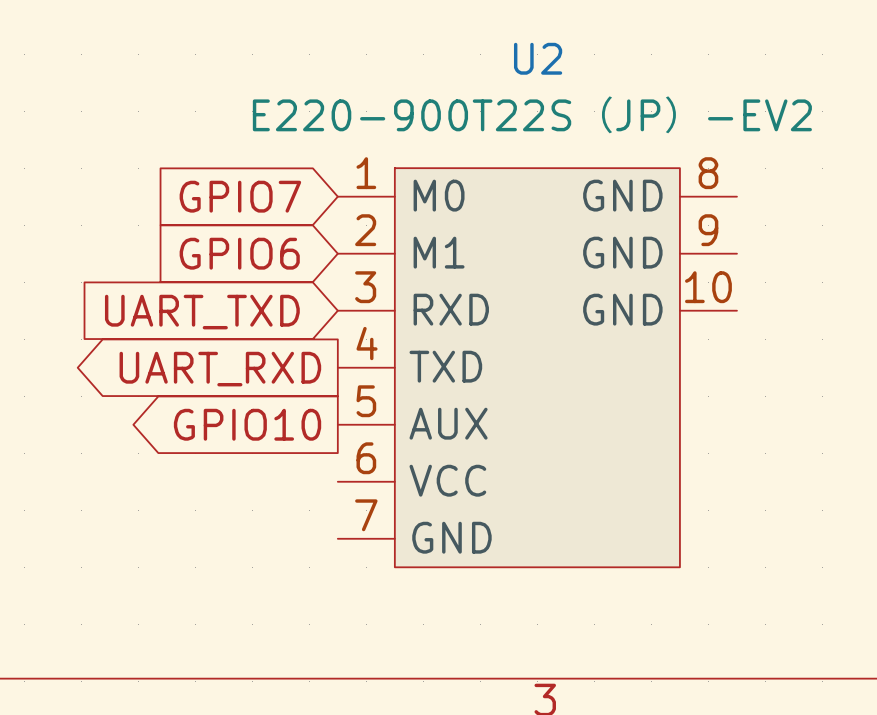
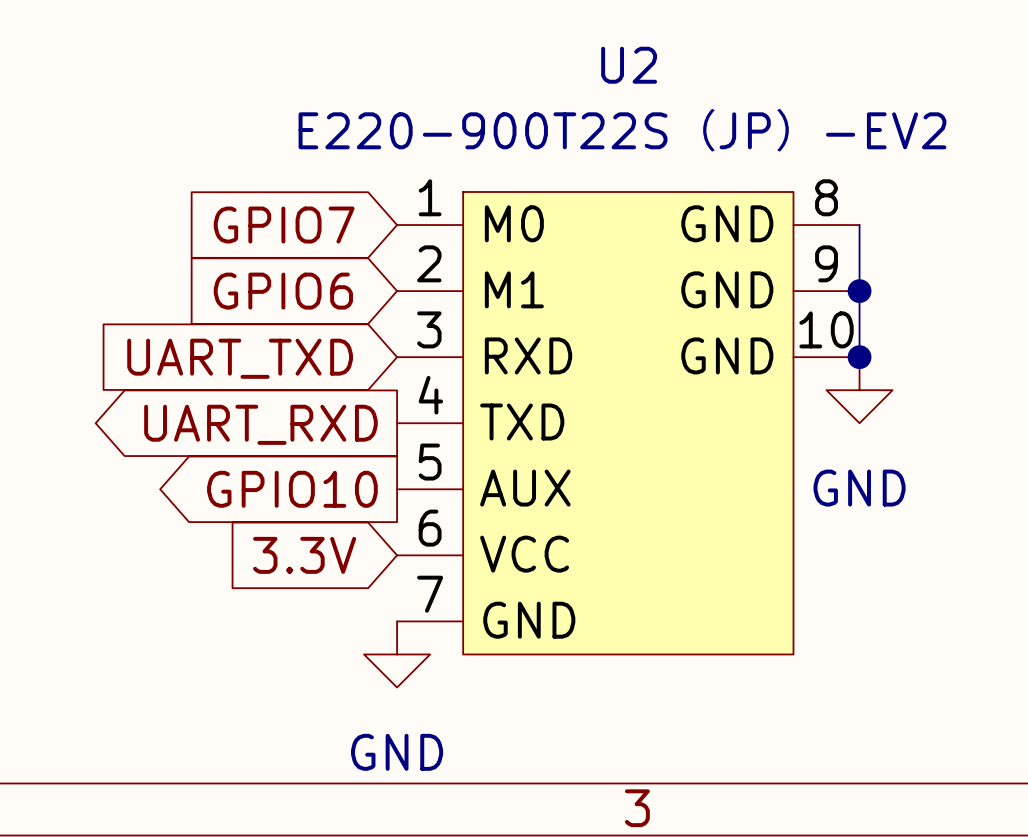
wire: none -> (859, 225) (859, 357)
junction: none -> (859, 291)
junction: none -> (859, 357)
power symbol: none -> GND (859, 390)
global label: none -> 3.3V (304, 555)
power symbol: none -> GND (397, 654)

